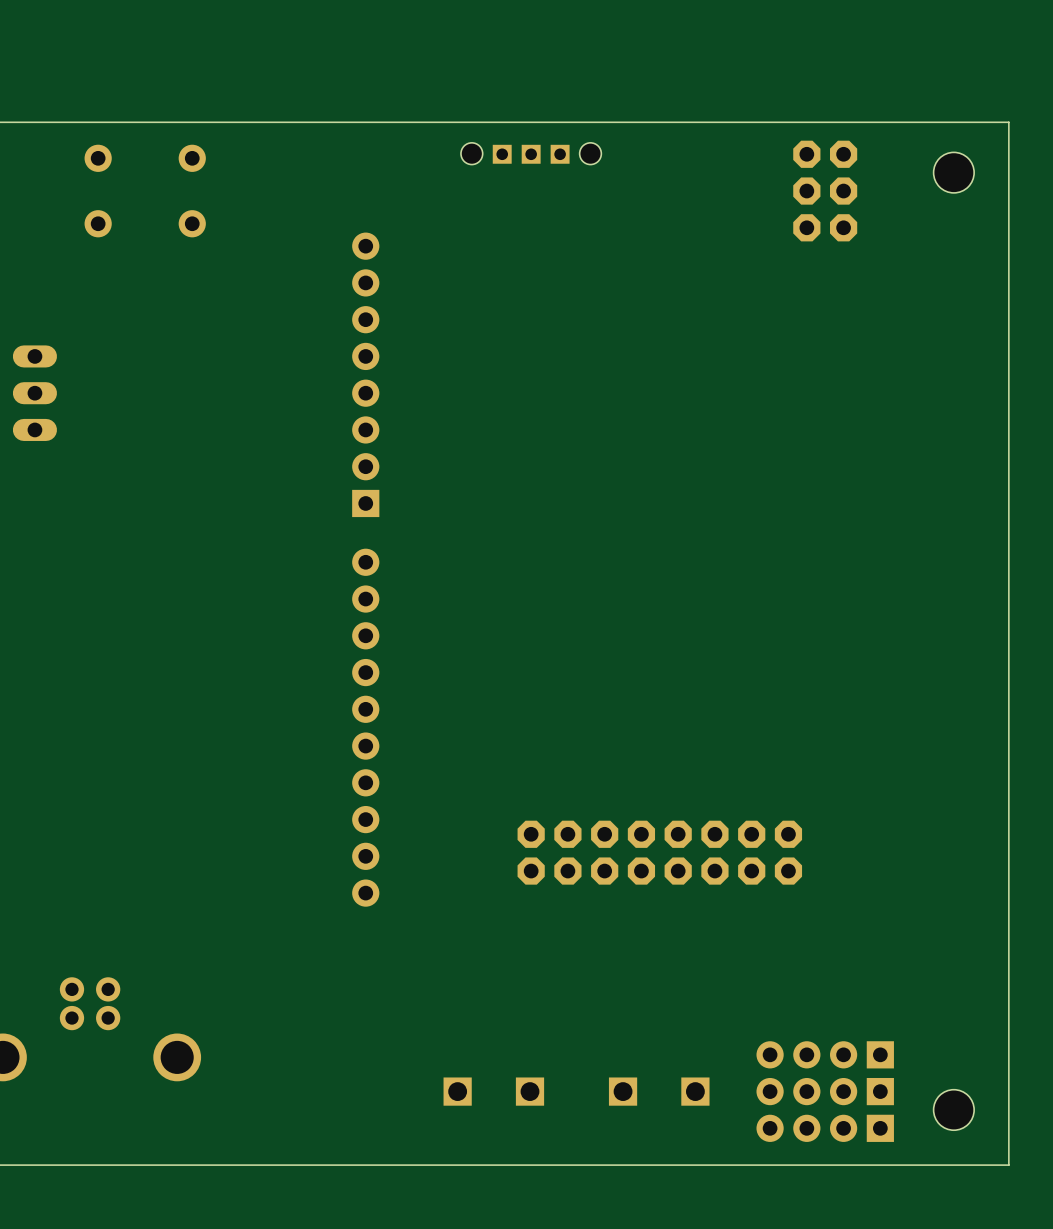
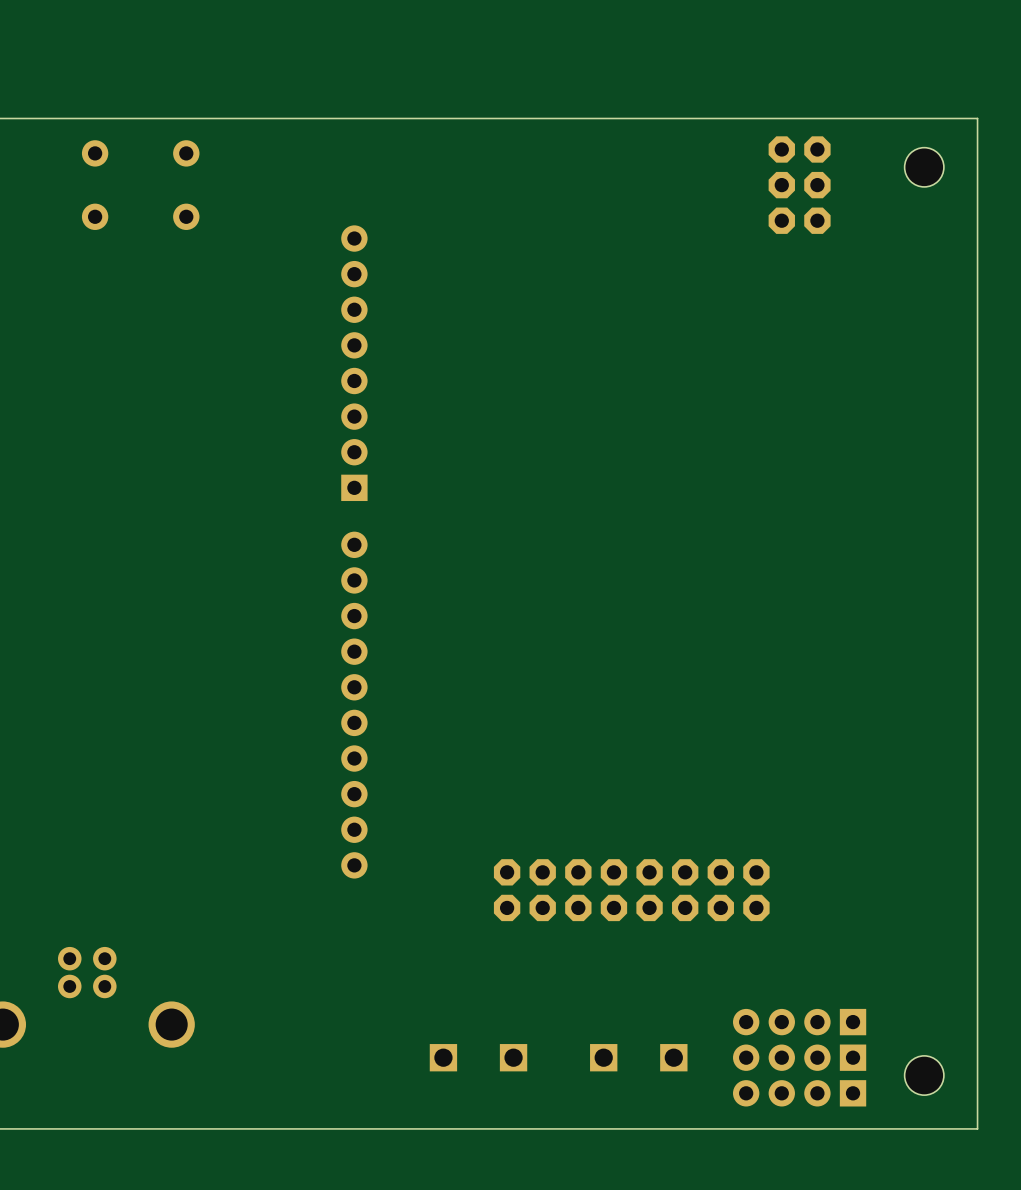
part: (531, 153) -> none
part: (34, 393) -> none
part position: (659, 852) -> (631, 890)

